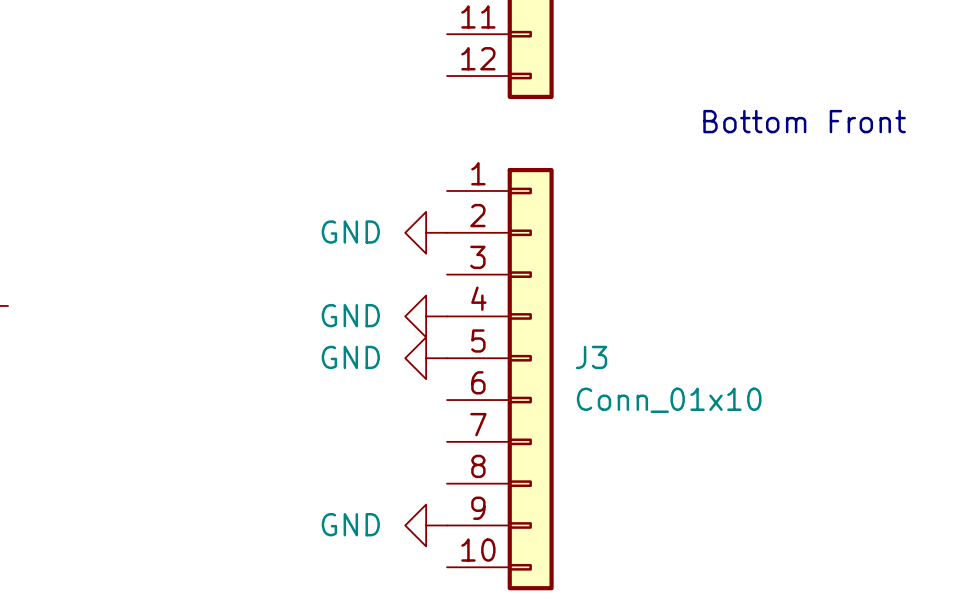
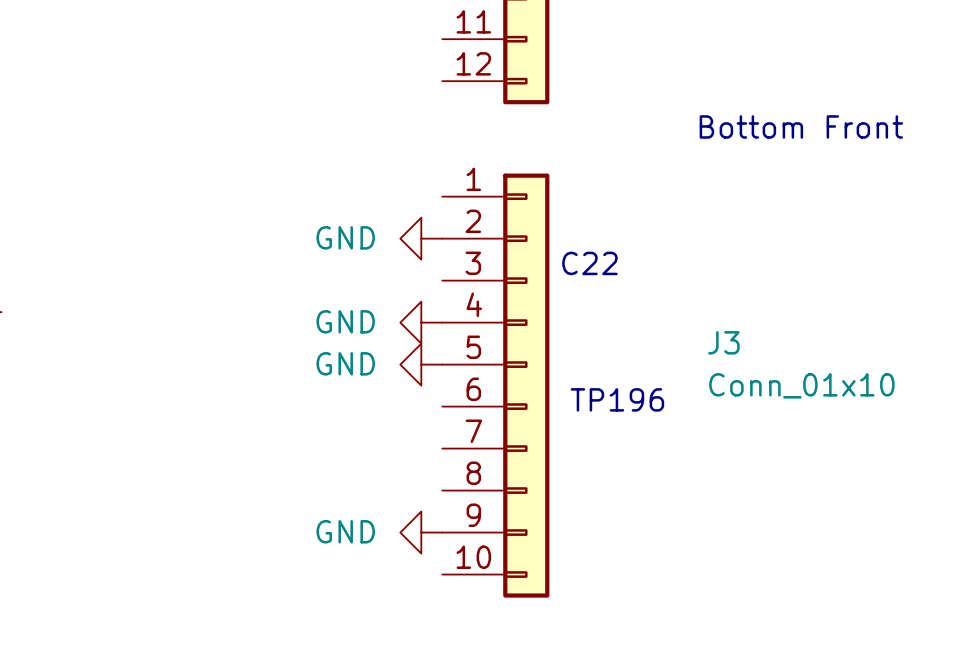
text: none -> C22 (589, 263)
J3 name position: J3 (591, 357) -> J3 (723, 342)
text: none -> TP196 (617, 399)
J3 value position: Conn_01x10 (669, 400) -> Conn_01x10 (801, 385)

